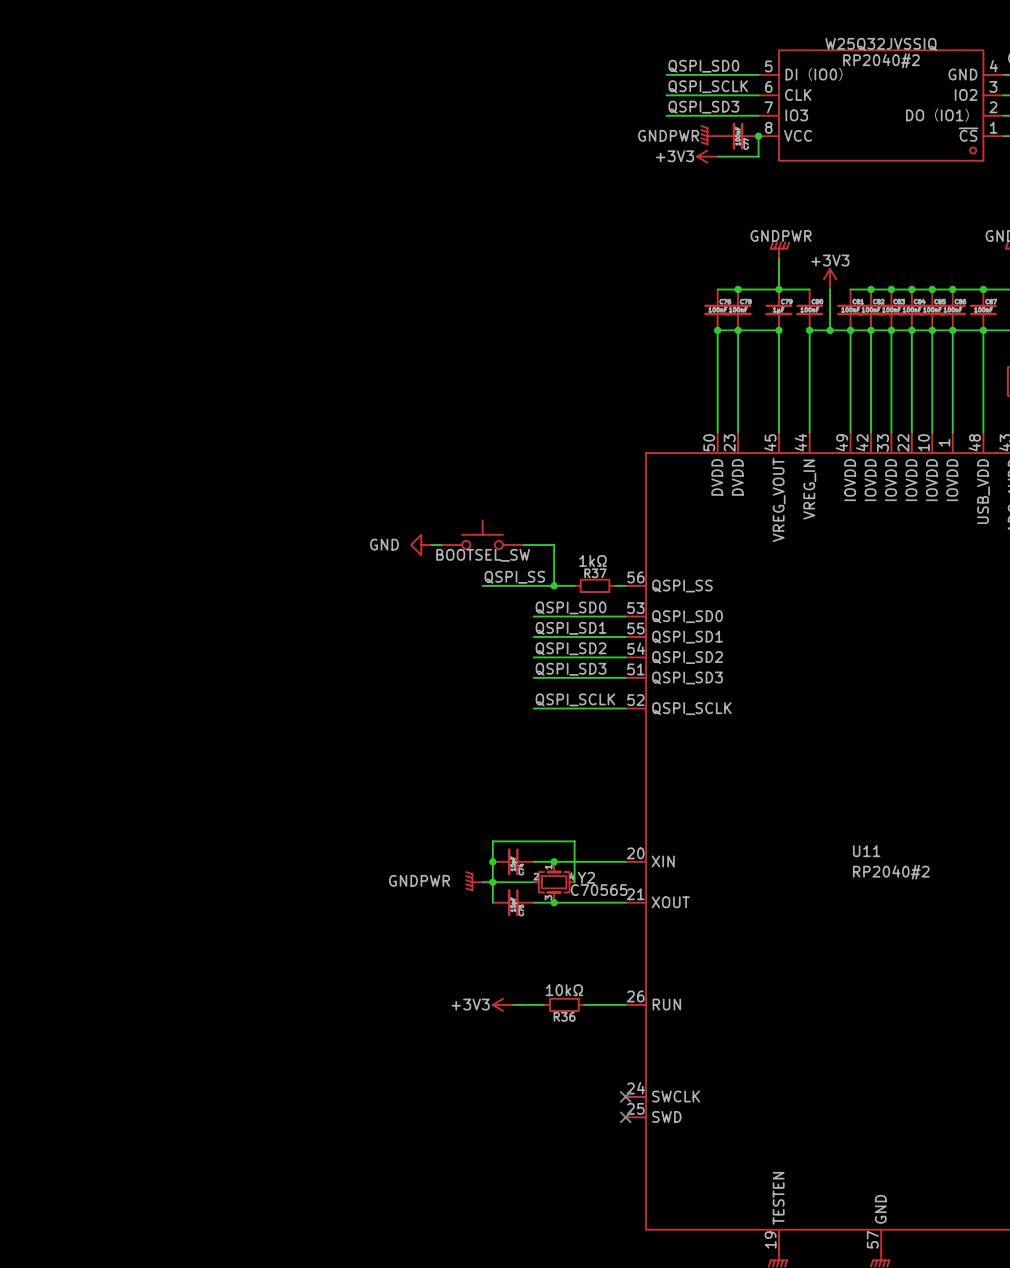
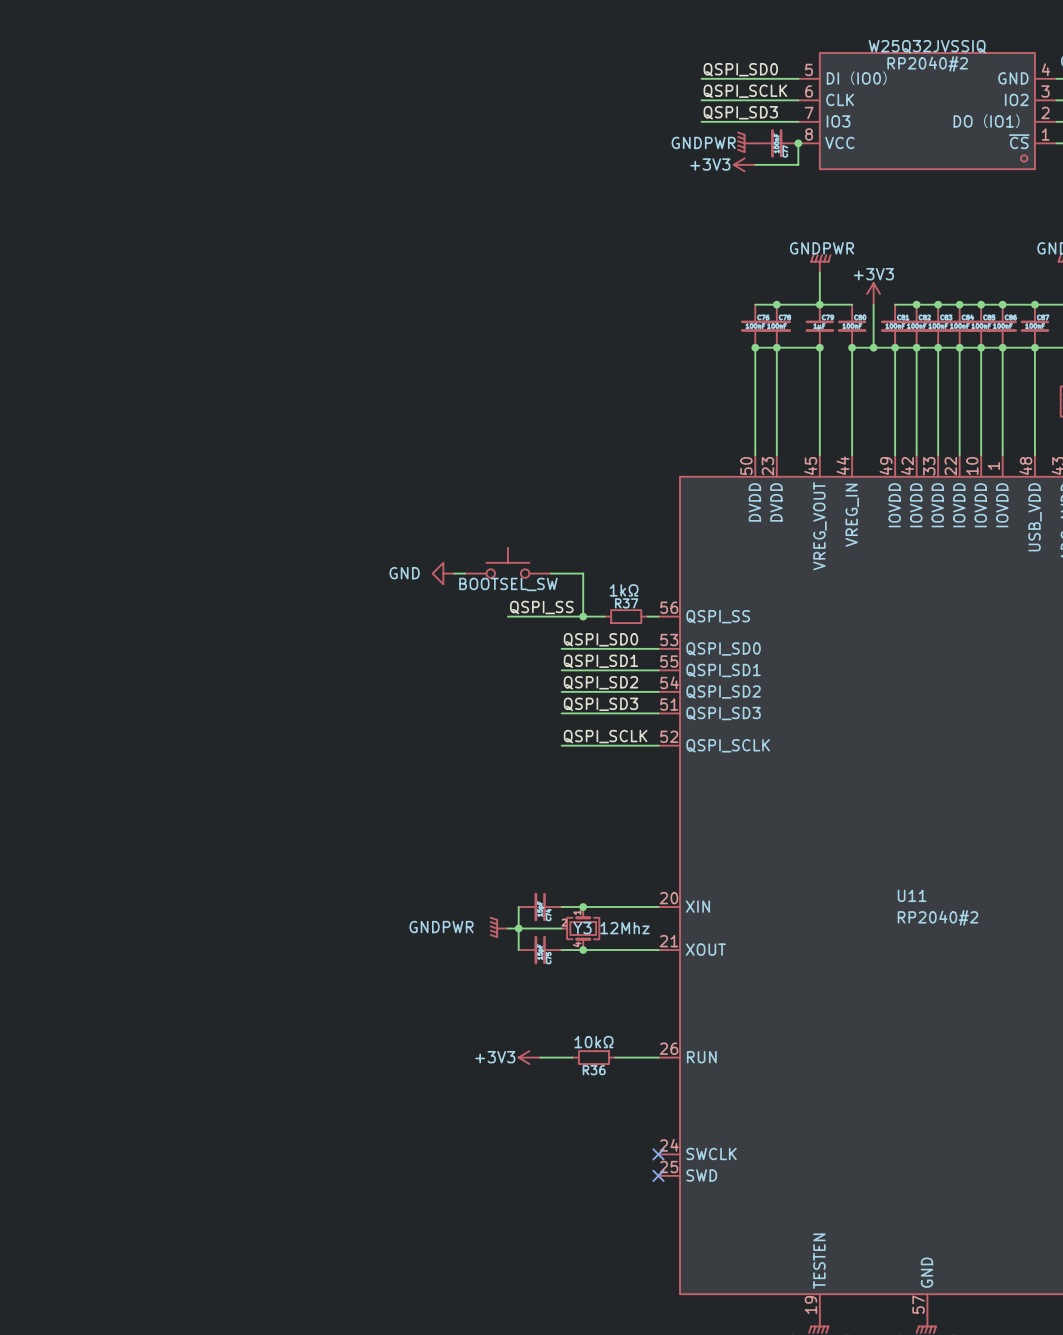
wire: (492, 861) (492, 841) (574, 841) (574, 882) -> none
junction: (492, 861) -> none
Y3: none -> 12Mhz (580, 928)
Y2: C70565 (554, 882) -> none

